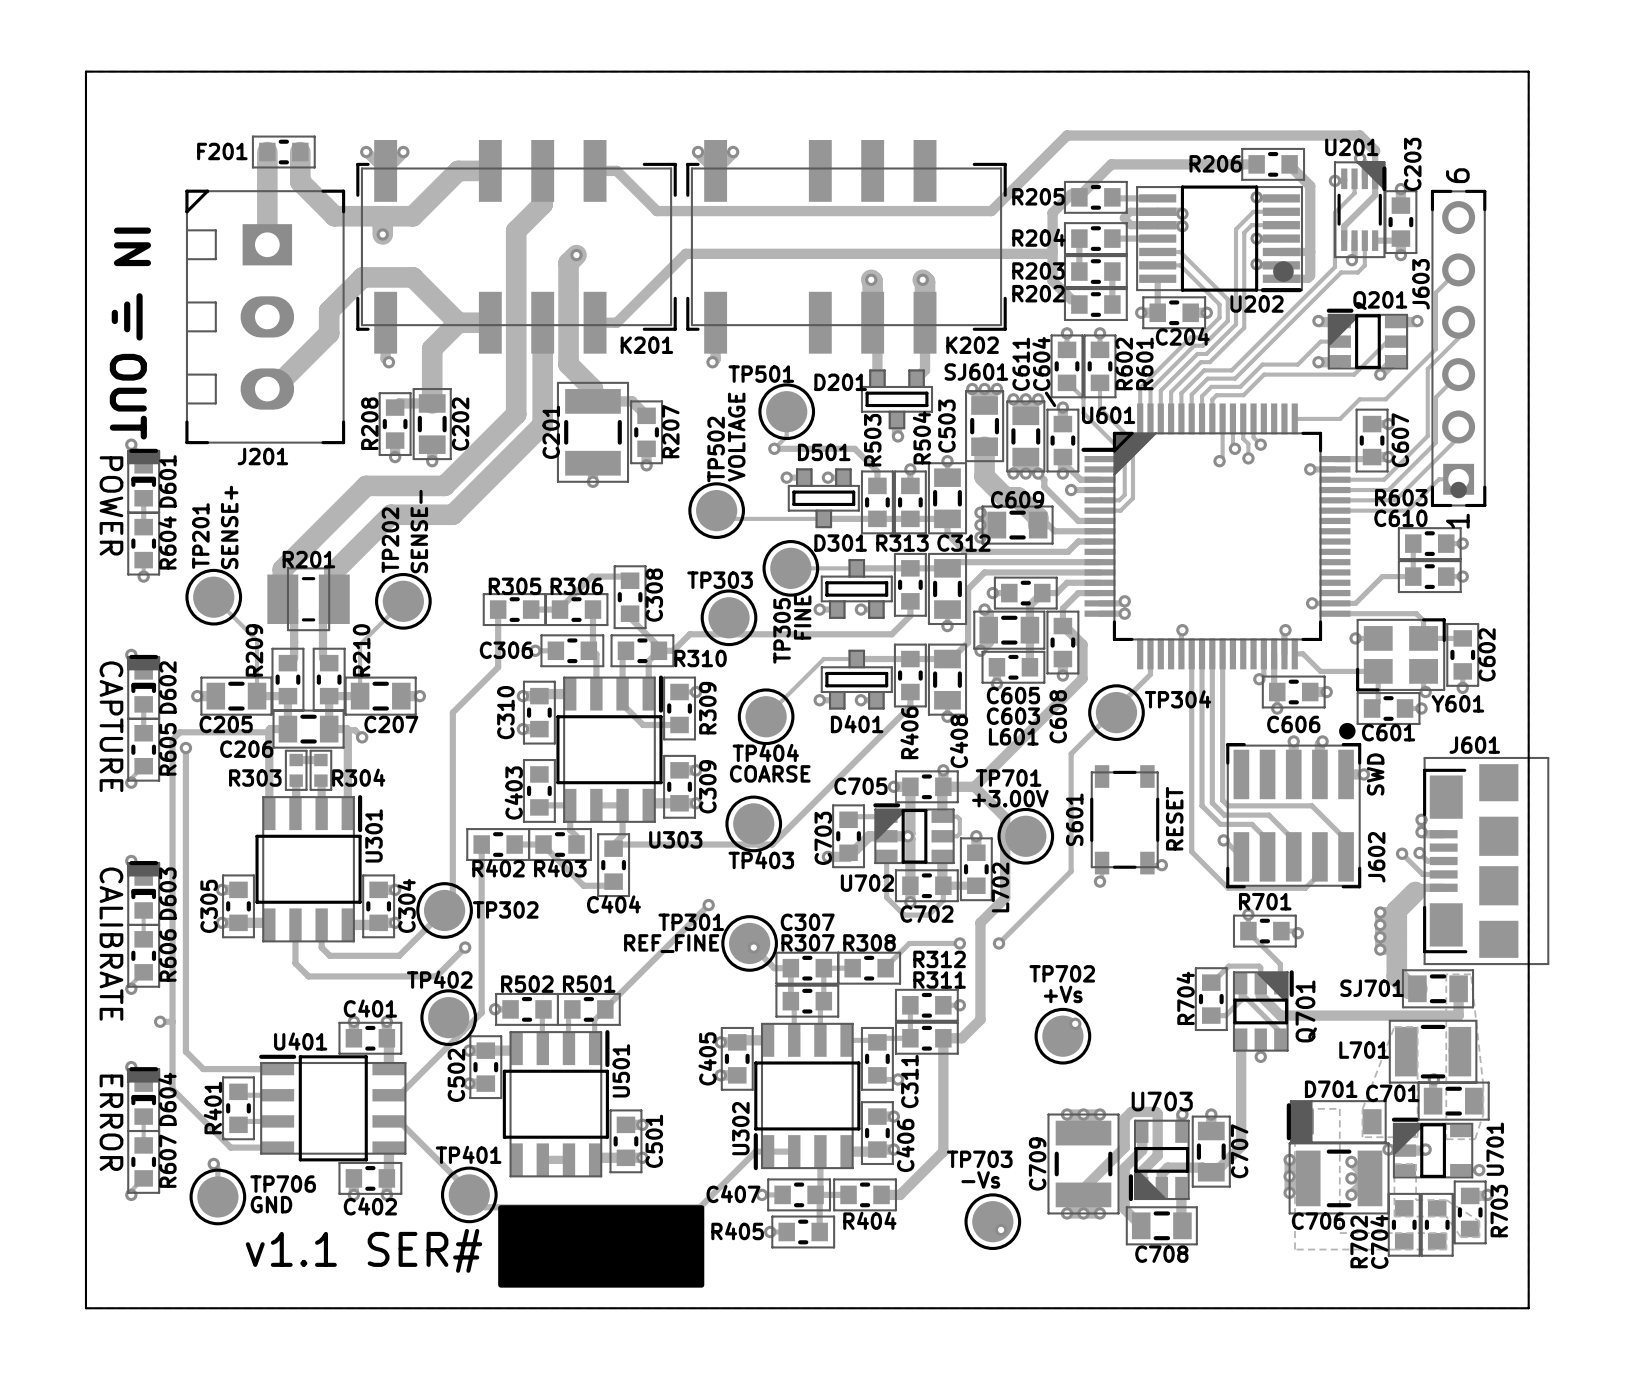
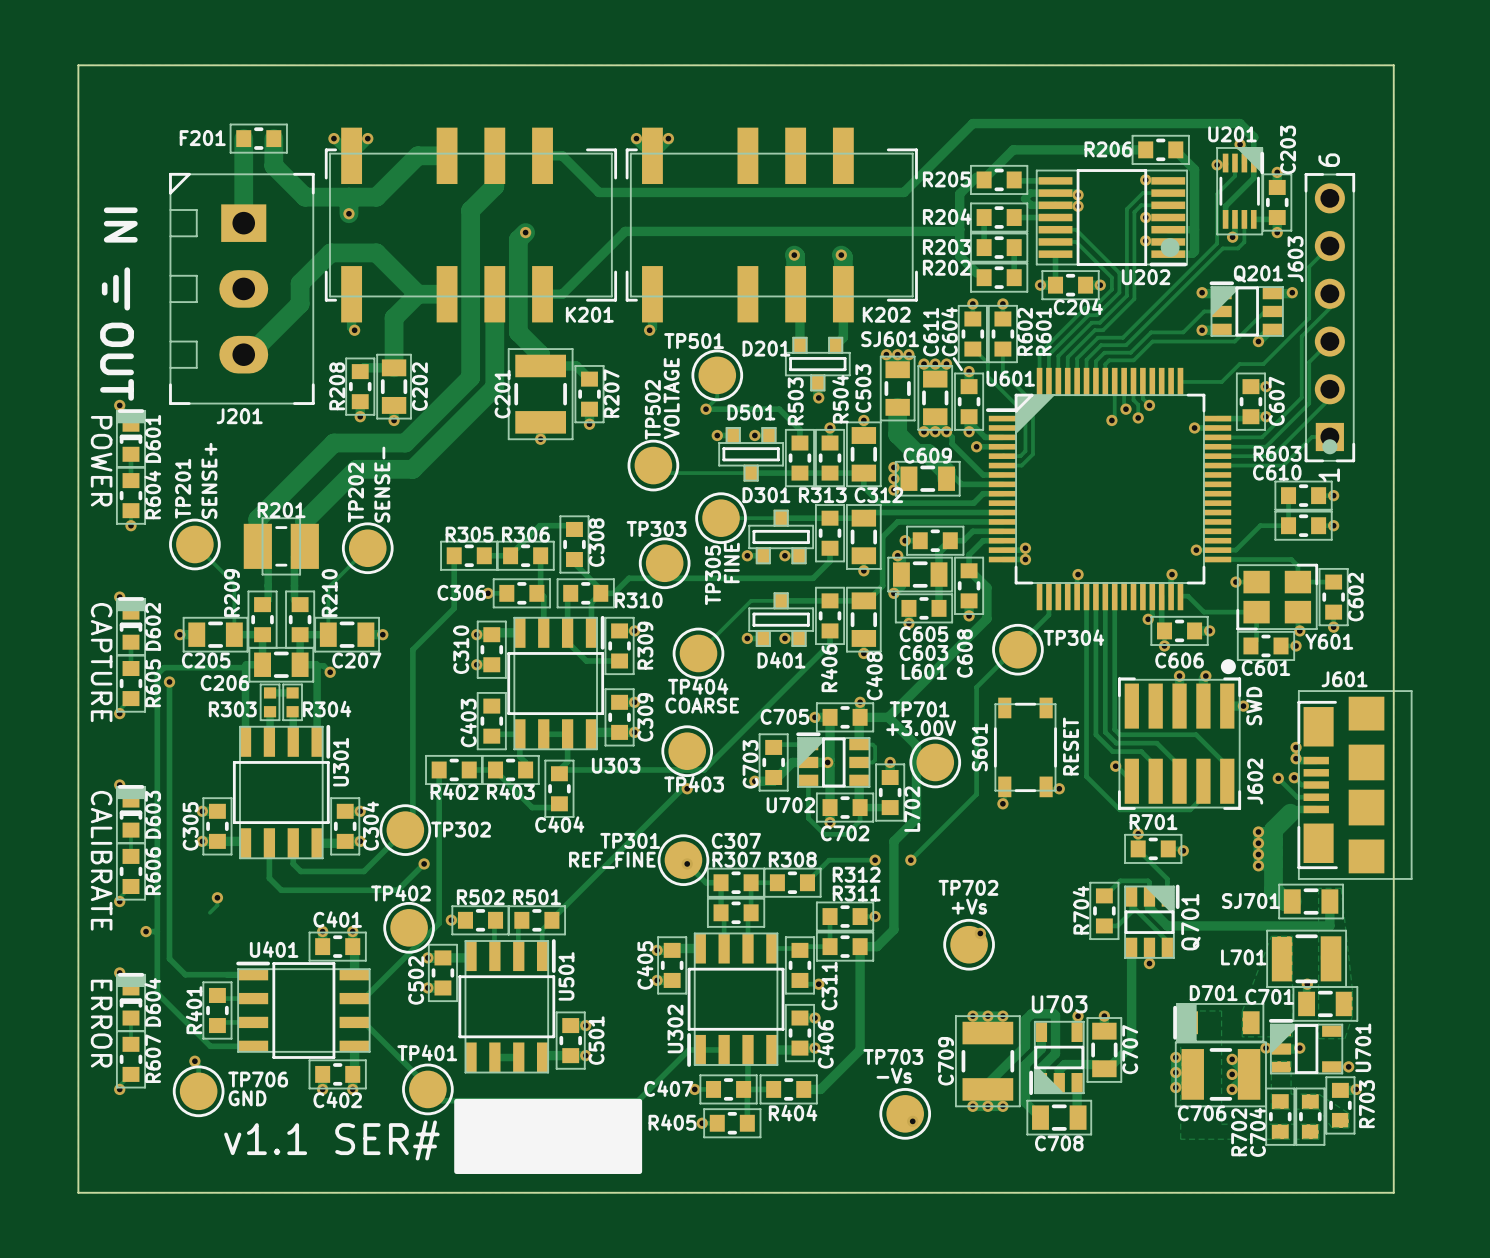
track: none -> (687, 788) (682, 788) (646, 825)
via position: (708, 905) -> (687, 788)
track: none -> (217, 897) (217, 905) (209, 912)
via: none -> (217, 897)

